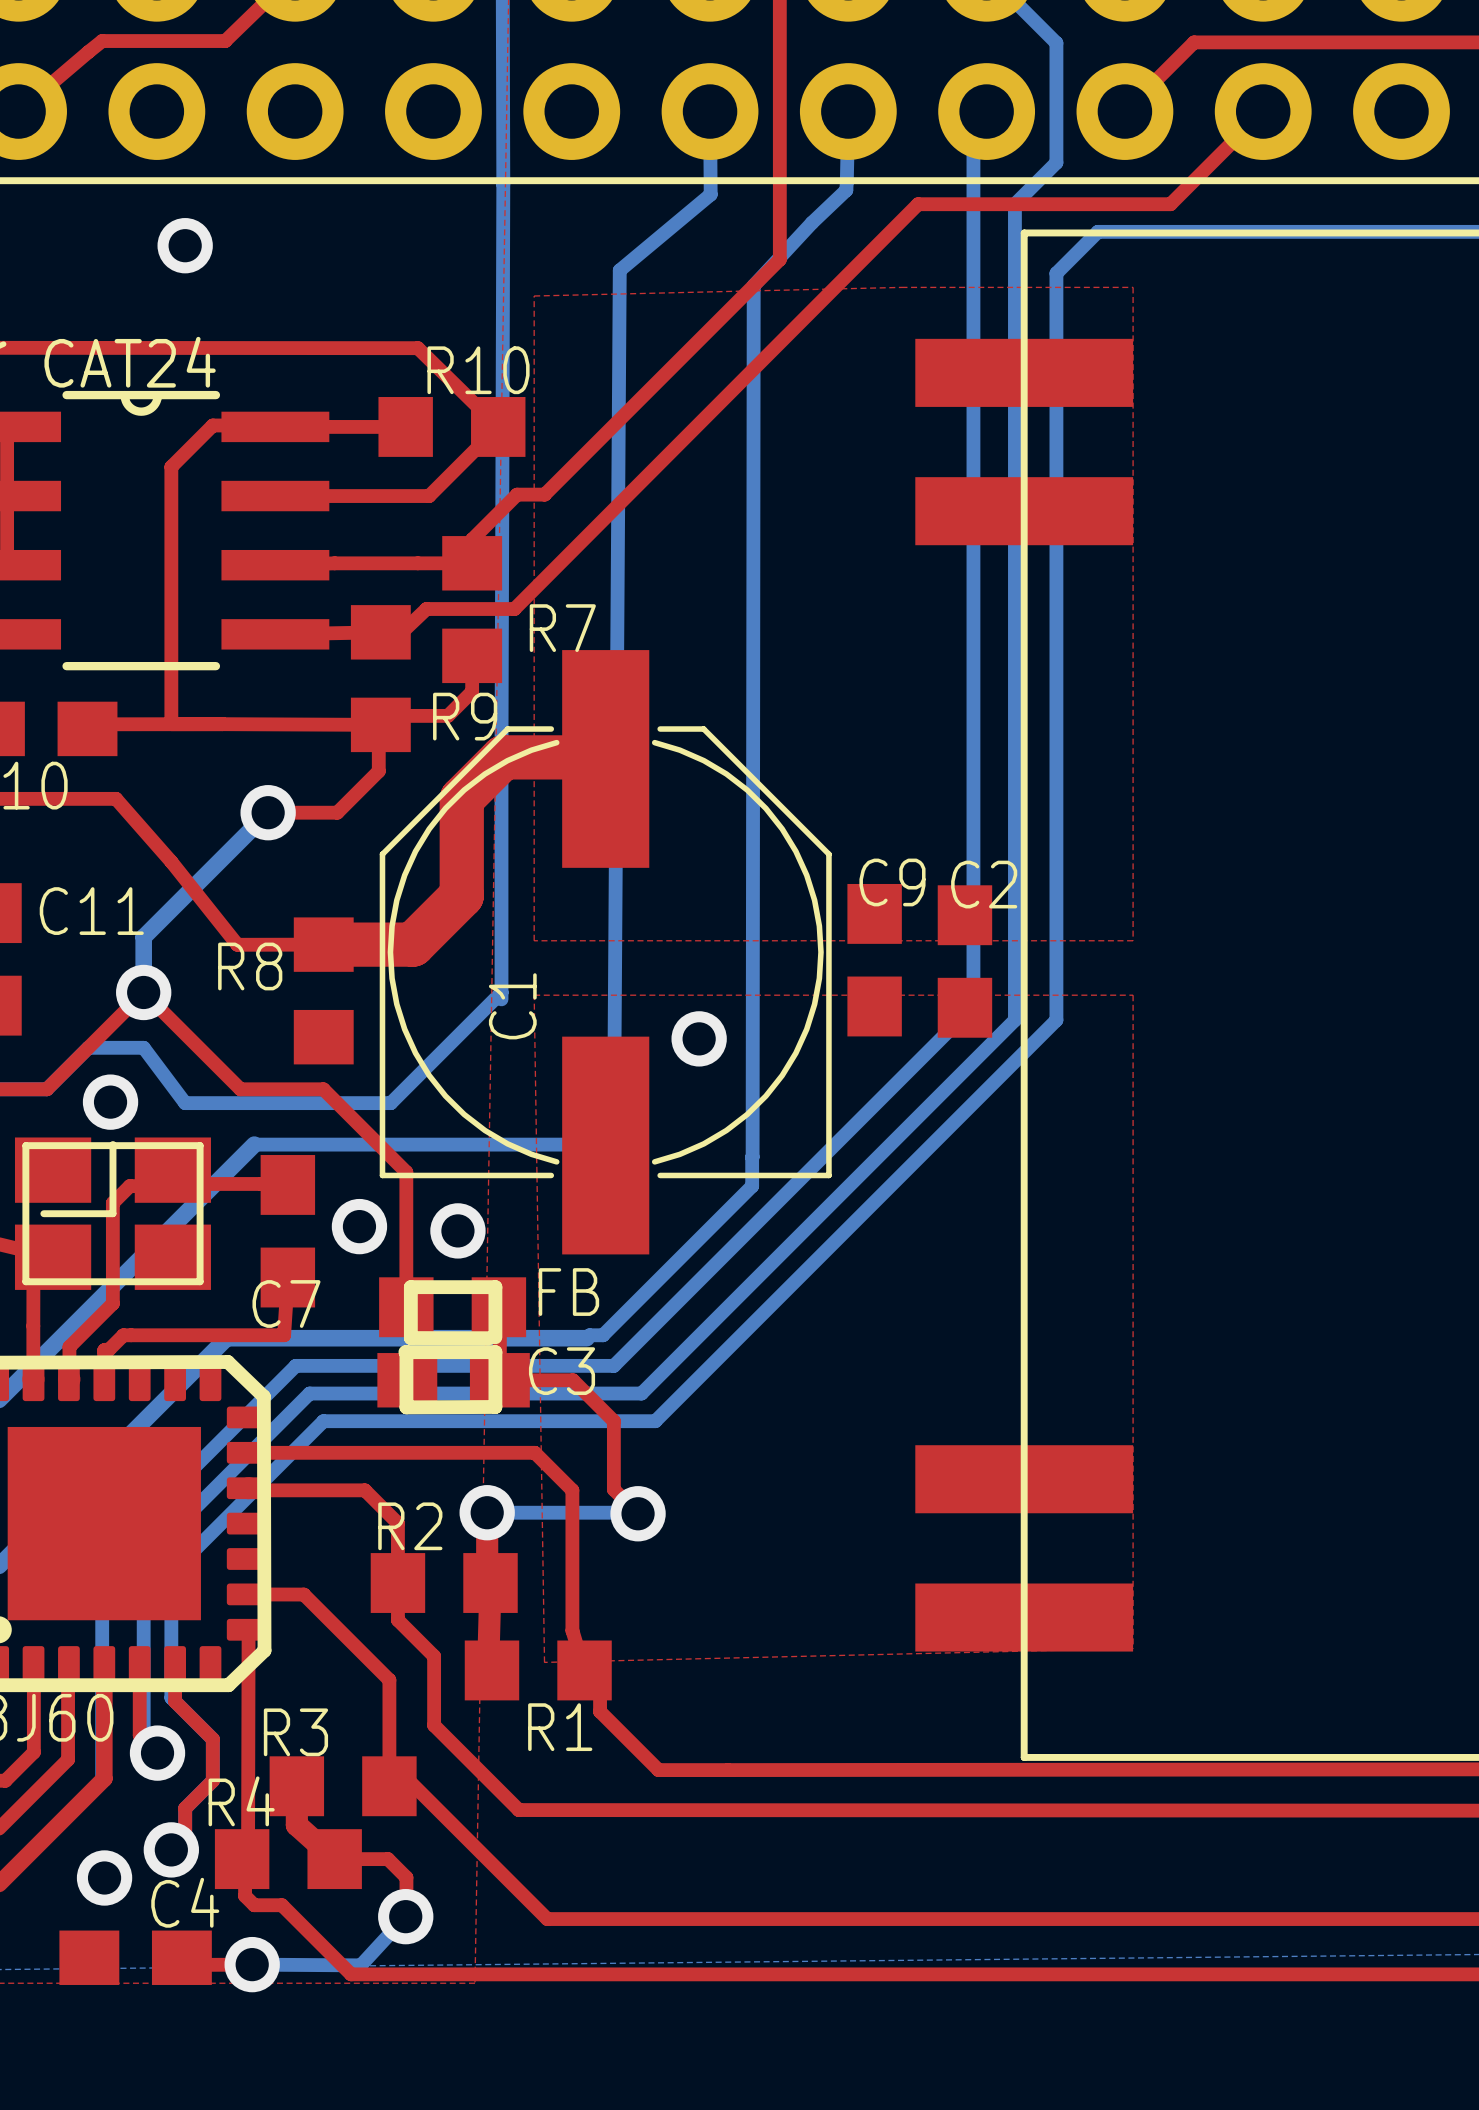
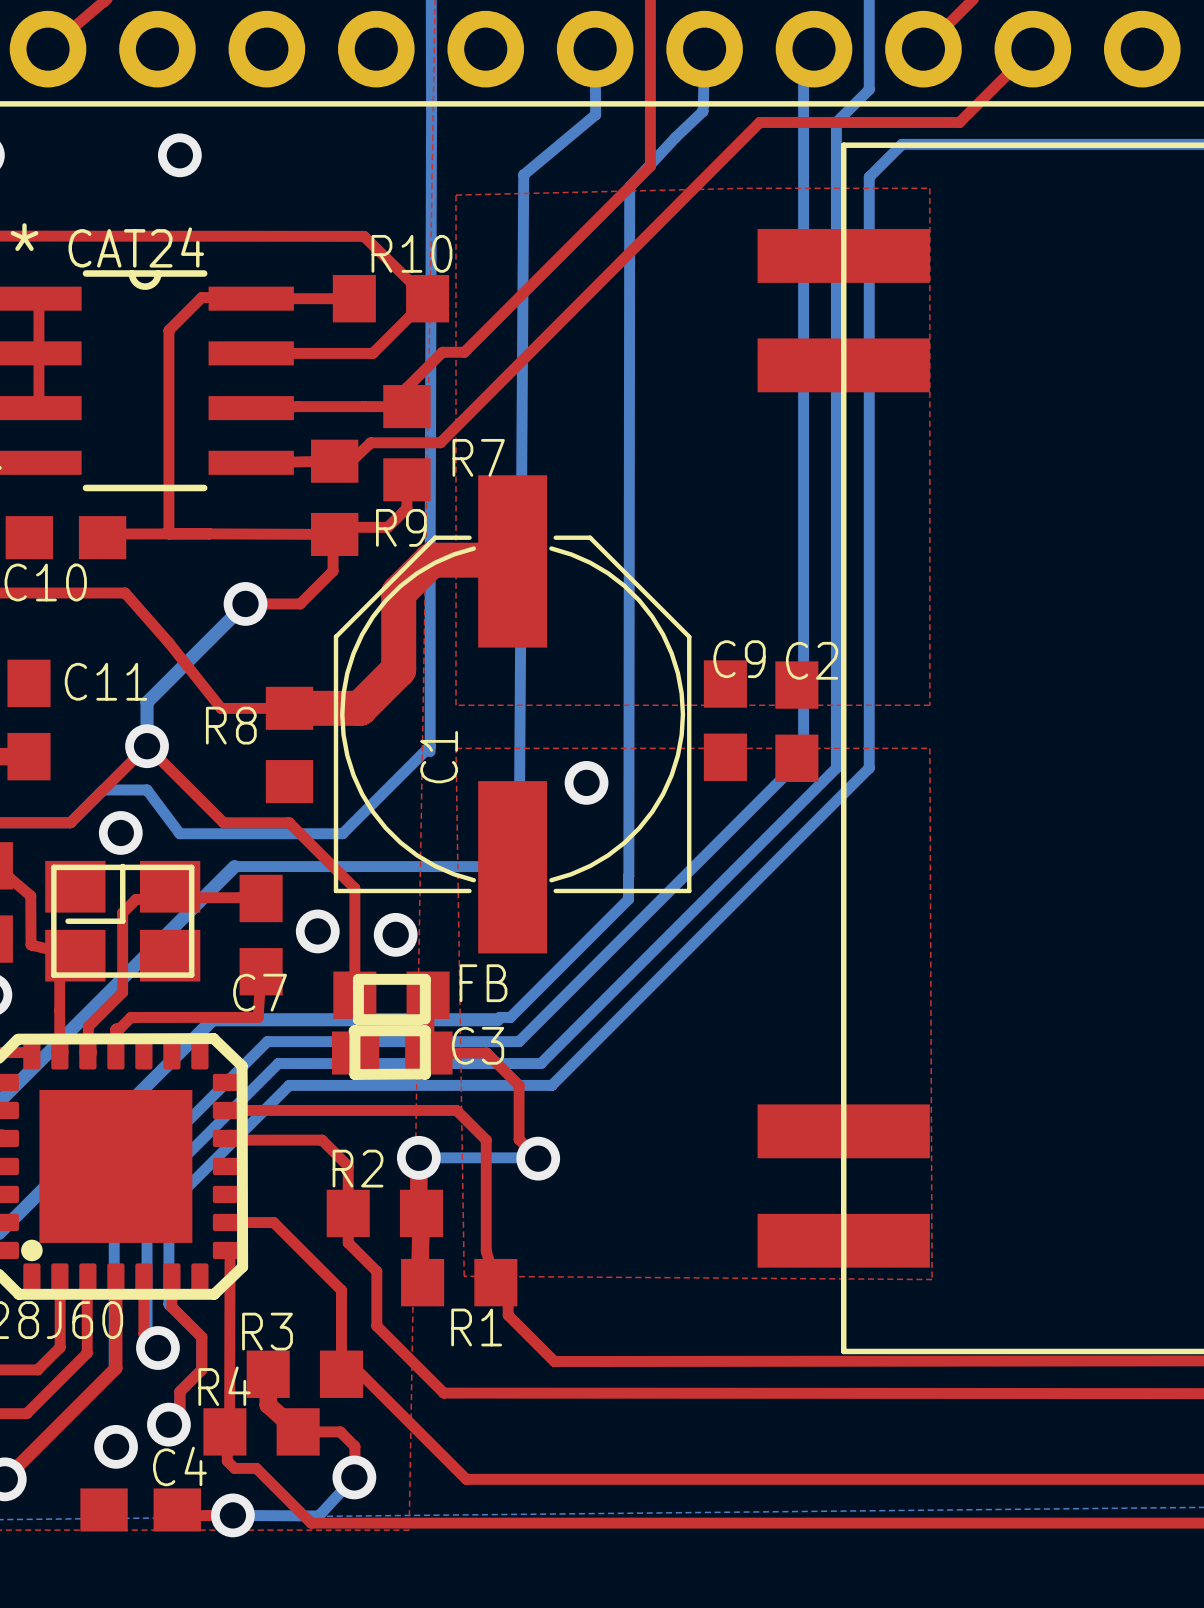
top zone outline: (1133, 995) (1133, 1648) (544, 1662) -> (929, 748) (932, 1279) (464, 1276)

